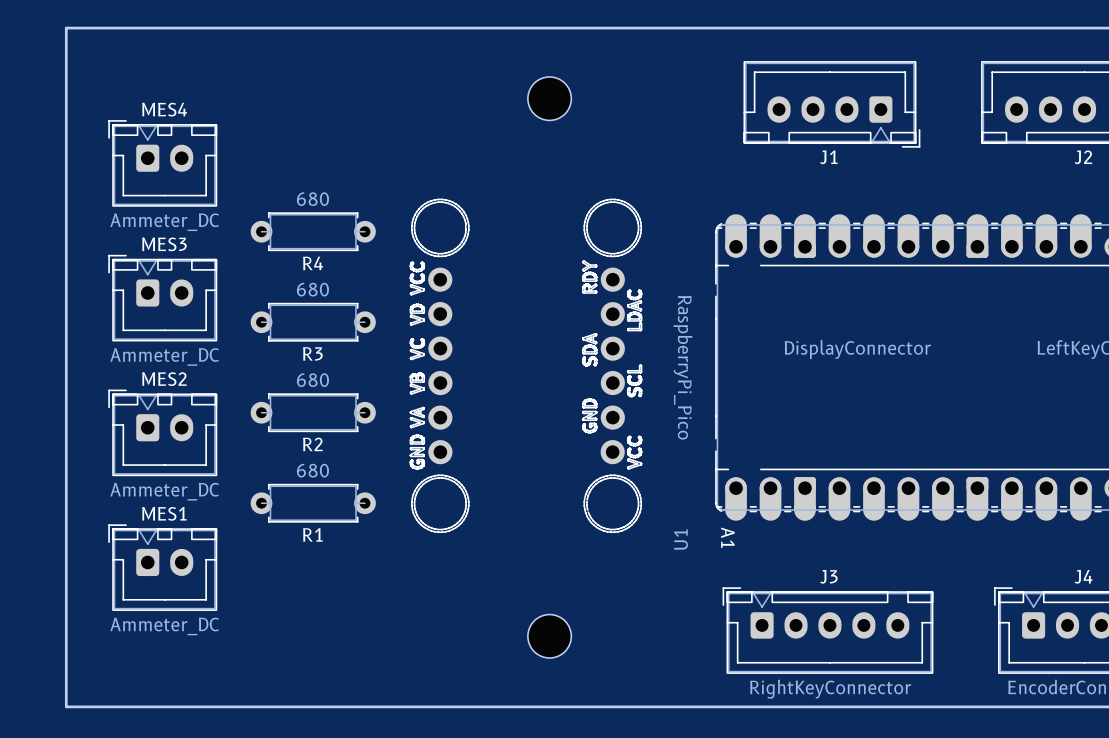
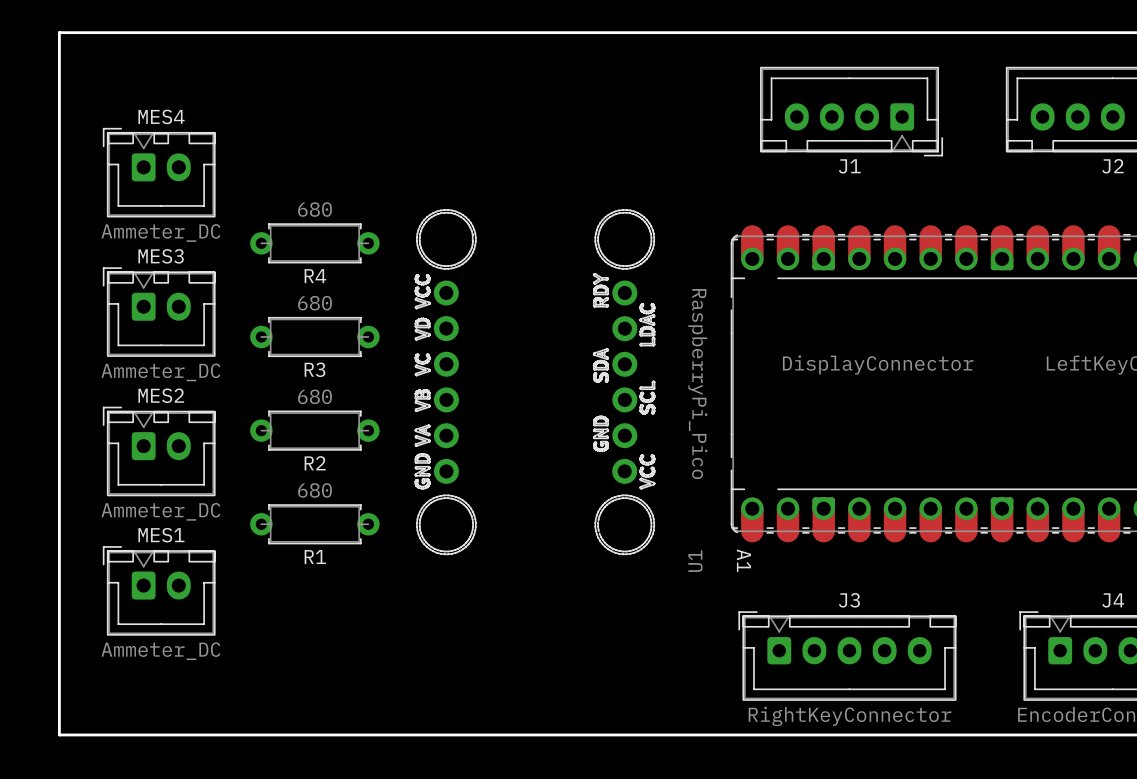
part: (549, 98) -> none
part: (549, 636) -> none

